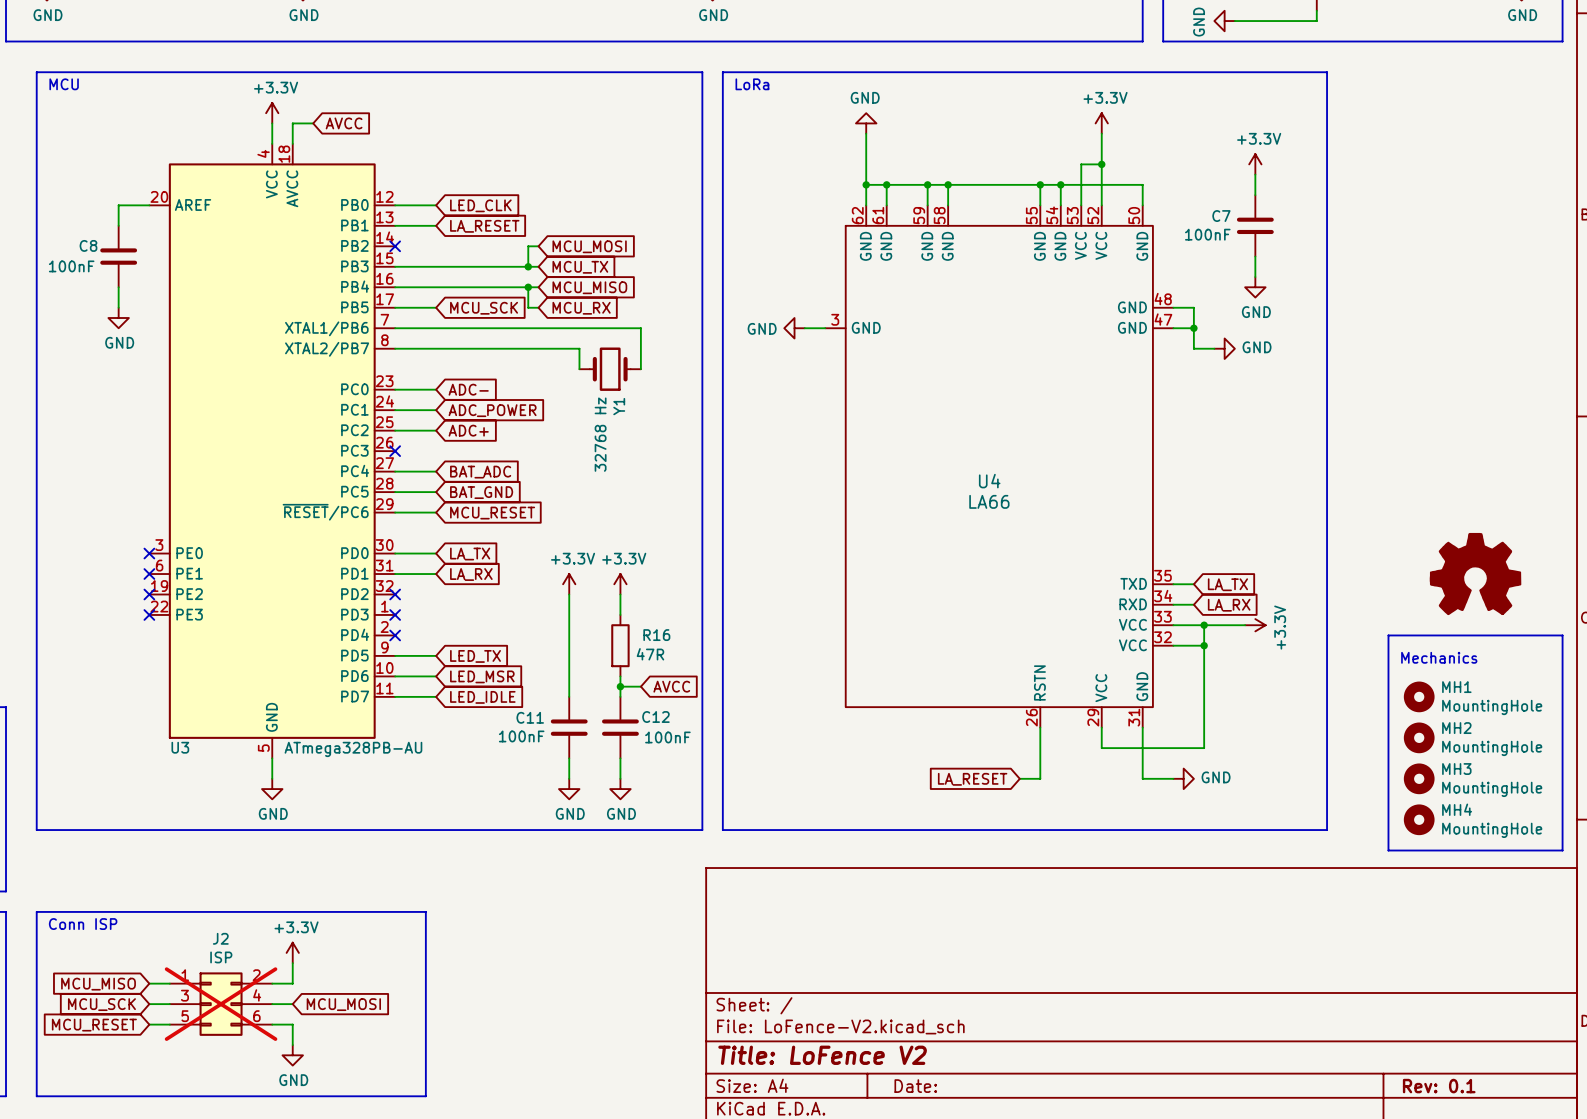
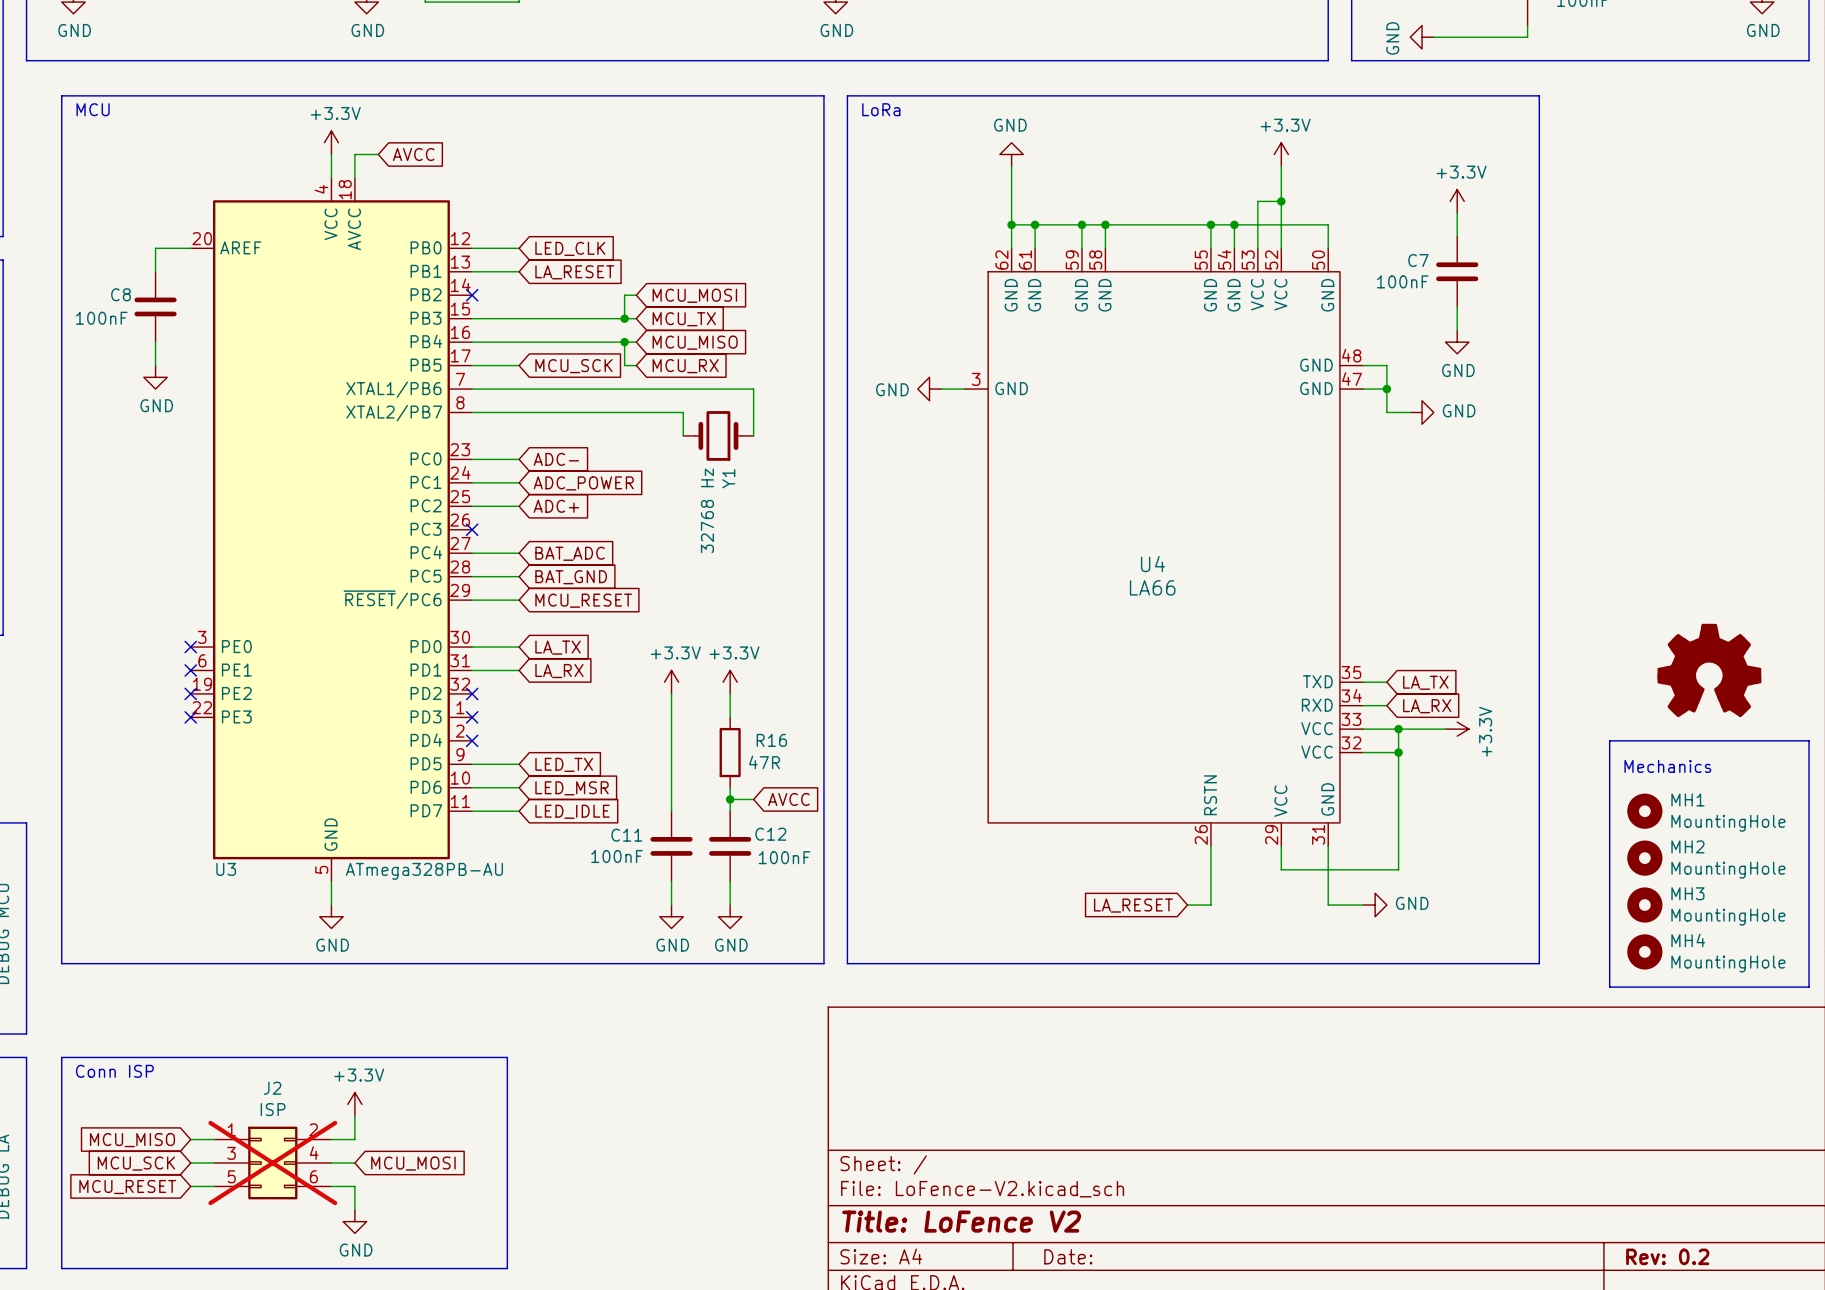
title block: Rev: 0.1 (1439, 1086) -> Rev: 0.2 (1667, 1256)

